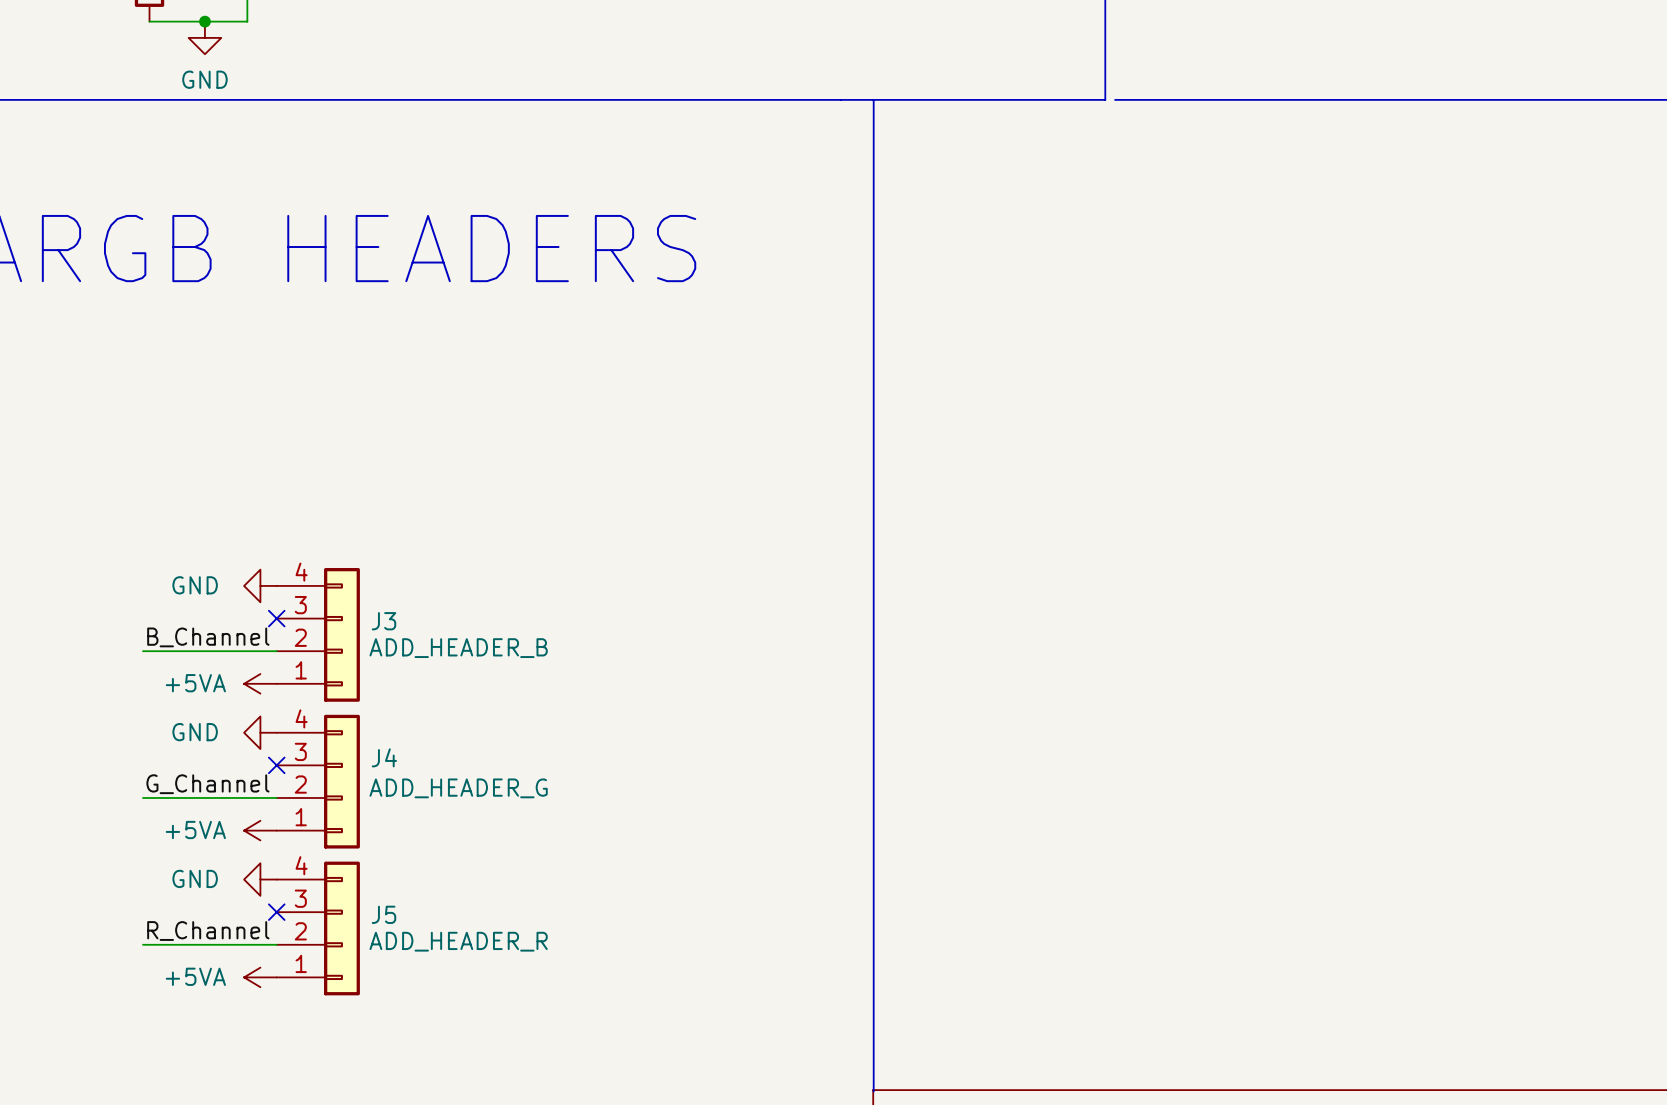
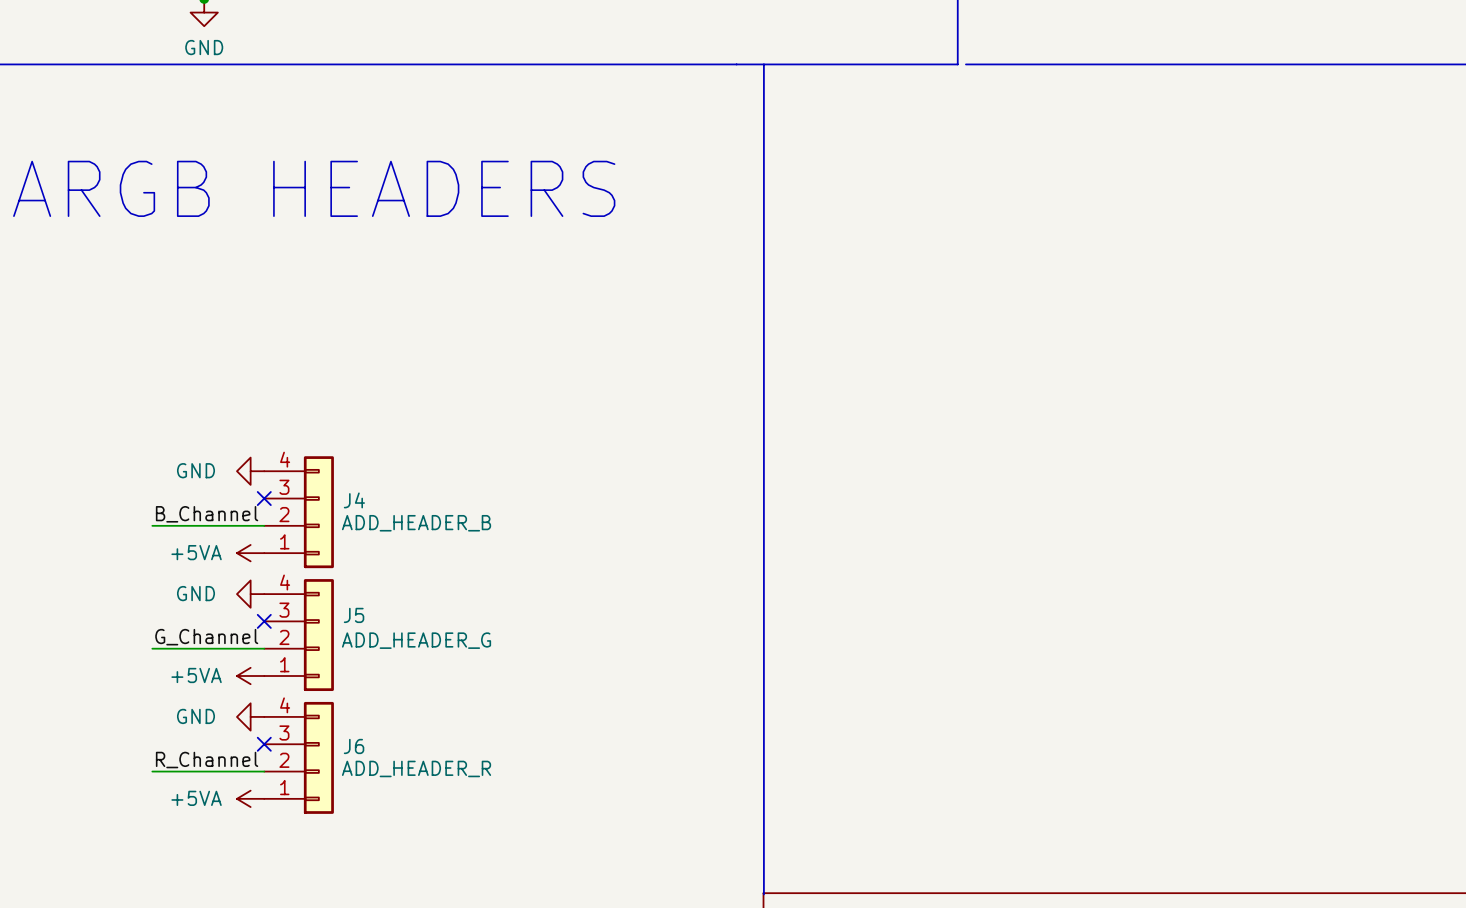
J3 name: J3 (383, 621) -> J4 (354, 500)
J4 name: J4 (384, 757) -> J5 (354, 615)
J5 name: J5 (383, 914) -> J6 (354, 746)

